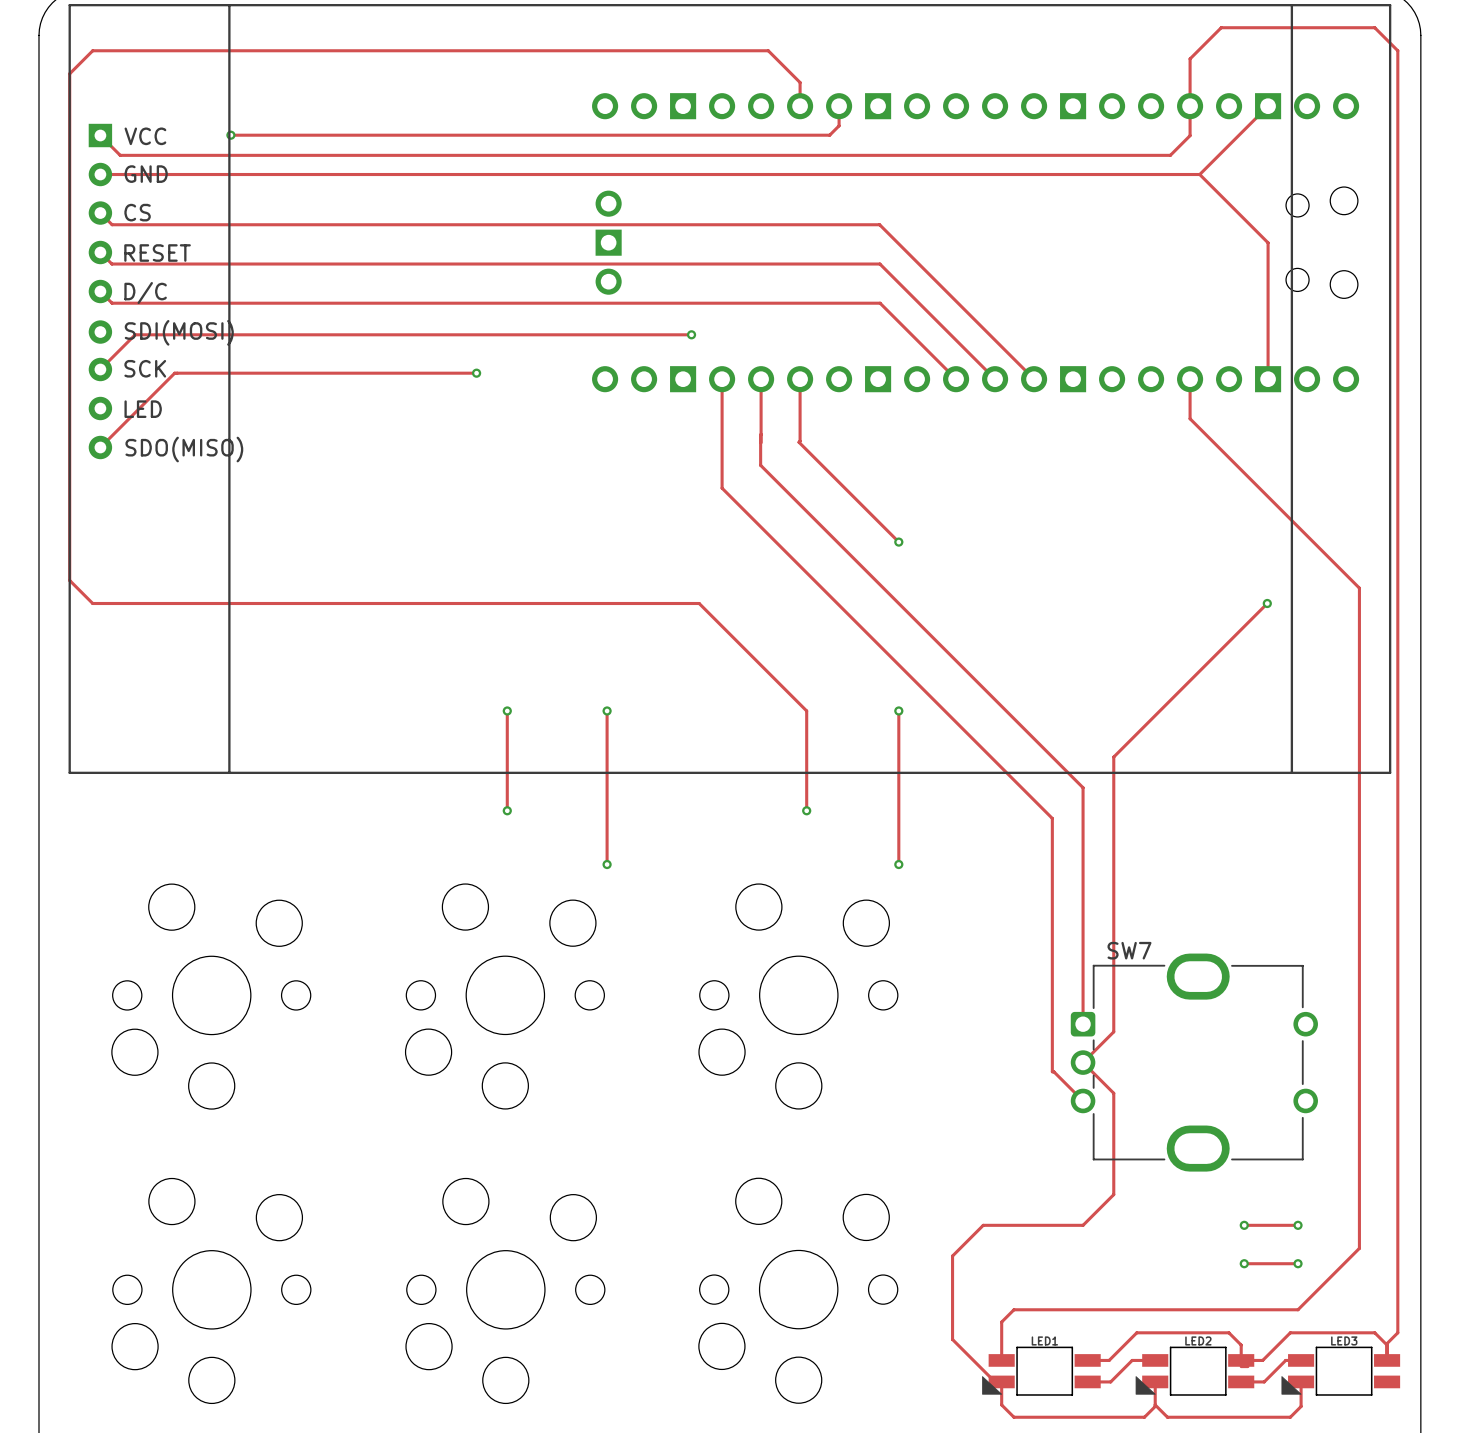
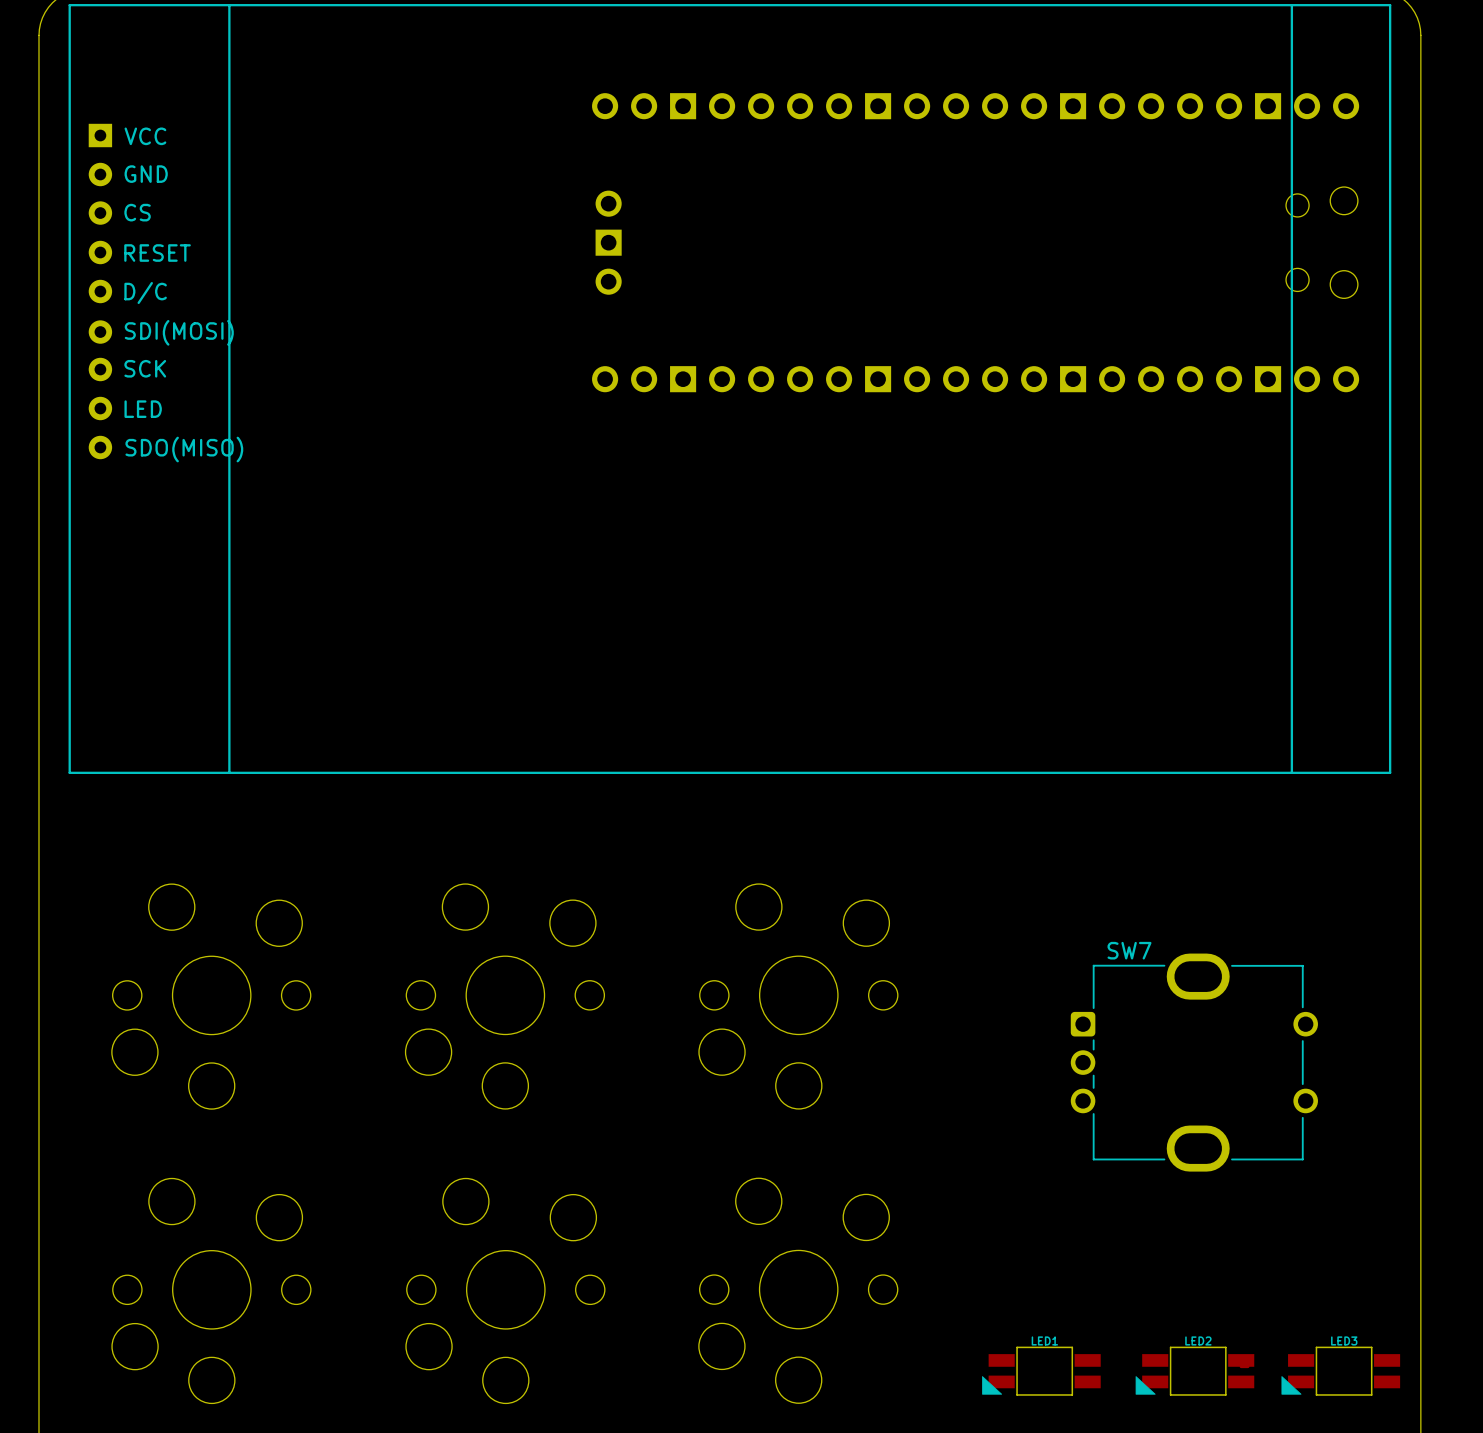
track: (800, 106) (800, 82) (768, 50) (92, 50) (69, 73) (69, 580) (92, 603) (699, 603) (806, 710) (806, 810) -> none
track: (839, 106) (839, 125) (829, 135) (230, 135) -> none
track: (1268, 106) (1199, 174) -> none
track: (100, 135) (120, 155) (1170, 155) (1190, 135) (1190, 58) (1221, 27) (1374, 27) (1397, 50) (1397, 1332) (1387, 1343) (1387, 1360) -> none
via: (230, 135) -> none
track: (100, 174) (1199, 174) -> none
track: (1199, 174) (1268, 242) (1268, 379) -> none
track: (100, 213) (112, 224) (879, 224) (1034, 379) -> none
track: (100, 252) (111, 264) (879, 264) (995, 379) -> none
track: (100, 291) (112, 303) (880, 303) (956, 379) -> none
track: (691, 334) (135, 334) (100, 369) -> none
via: (691, 334) -> none
track: (476, 373) (174, 373) (100, 447) -> none
via: (476, 373) -> none
track: (722, 379) (722, 488) (1052, 818) (1052, 1071) (1083, 1100) -> none
track: (761, 379) (761, 442) -> none
track: (800, 379) (799, 442) (898, 542) -> none
track: (1190, 379) (1190, 418) (1359, 588) (1359, 1248) (1298, 1309) (1013, 1309) (1001, 1322) (1001, 1360) -> none
track: (761, 434) (760, 465) (1083, 787) (1083, 1024) -> none
via: (898, 542) -> none
track: (1267, 603) (1113, 757) (1113, 1031) (1083, 1062) (1113, 1093) (1113, 1194) (1083, 1225) (983, 1225) (952, 1256) (952, 1339) (994, 1381) (1001, 1381) (1001, 1404) (1013, 1417) (1144, 1417) (1155, 1406) (1155, 1381) -> none
via: (1267, 603) -> none
track: (507, 710) (507, 810) -> none
via: (507, 710) -> none
track: (607, 710) (607, 864) -> none
via: (607, 710) -> none
track: (898, 710) (898, 864) -> none
via: (898, 710) -> none
via: (507, 810) -> none
via: (806, 810) -> none
via: (607, 864) -> none
via: (898, 864) -> none
track: (1244, 1225) (1298, 1225) -> none
via: (1244, 1225) -> none
via: (1298, 1225) -> none
track: (1244, 1263) (1298, 1263) -> none
via: (1244, 1263) -> none
via: (1298, 1263) -> none
track: (1387, 1345) (1374, 1332) (1290, 1332) (1262, 1360) (1241, 1360) (1241, 1345) (1228, 1332) (1136, 1332) (1109, 1360) (1087, 1360) -> none
track: (1155, 1360) (1132, 1360) (1110, 1381) (1087, 1381) -> none
track: (1301, 1360) (1285, 1360) (1264, 1381) (1241, 1381) -> none
track: (1301, 1381) (1301, 1406) (1290, 1417) (1167, 1417) (1155, 1404) -> none

